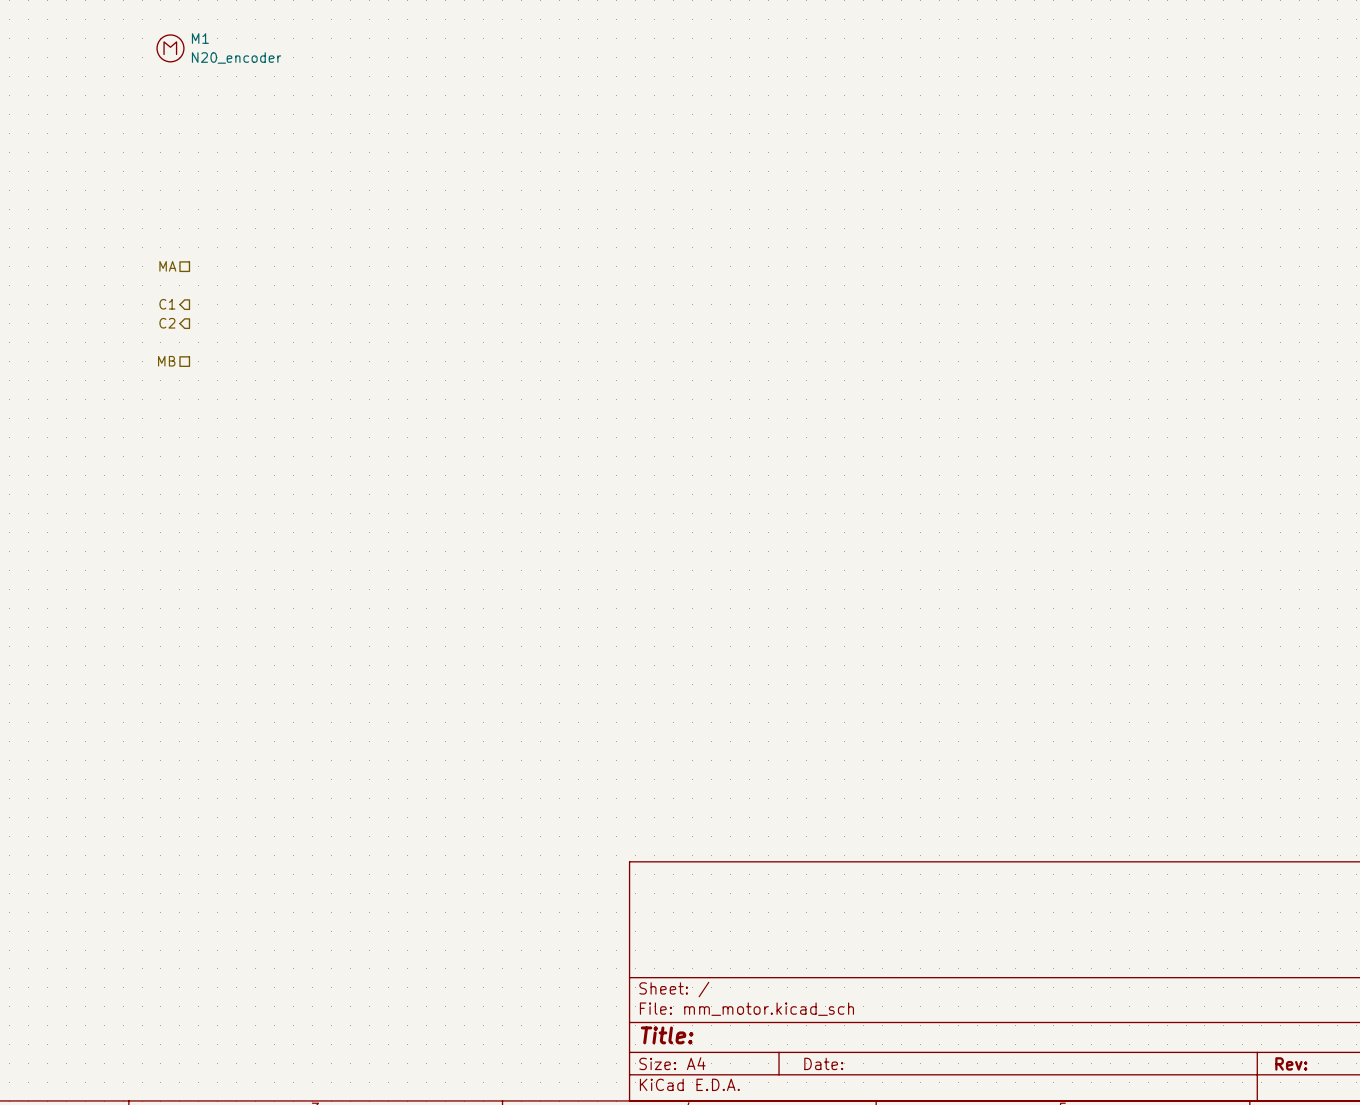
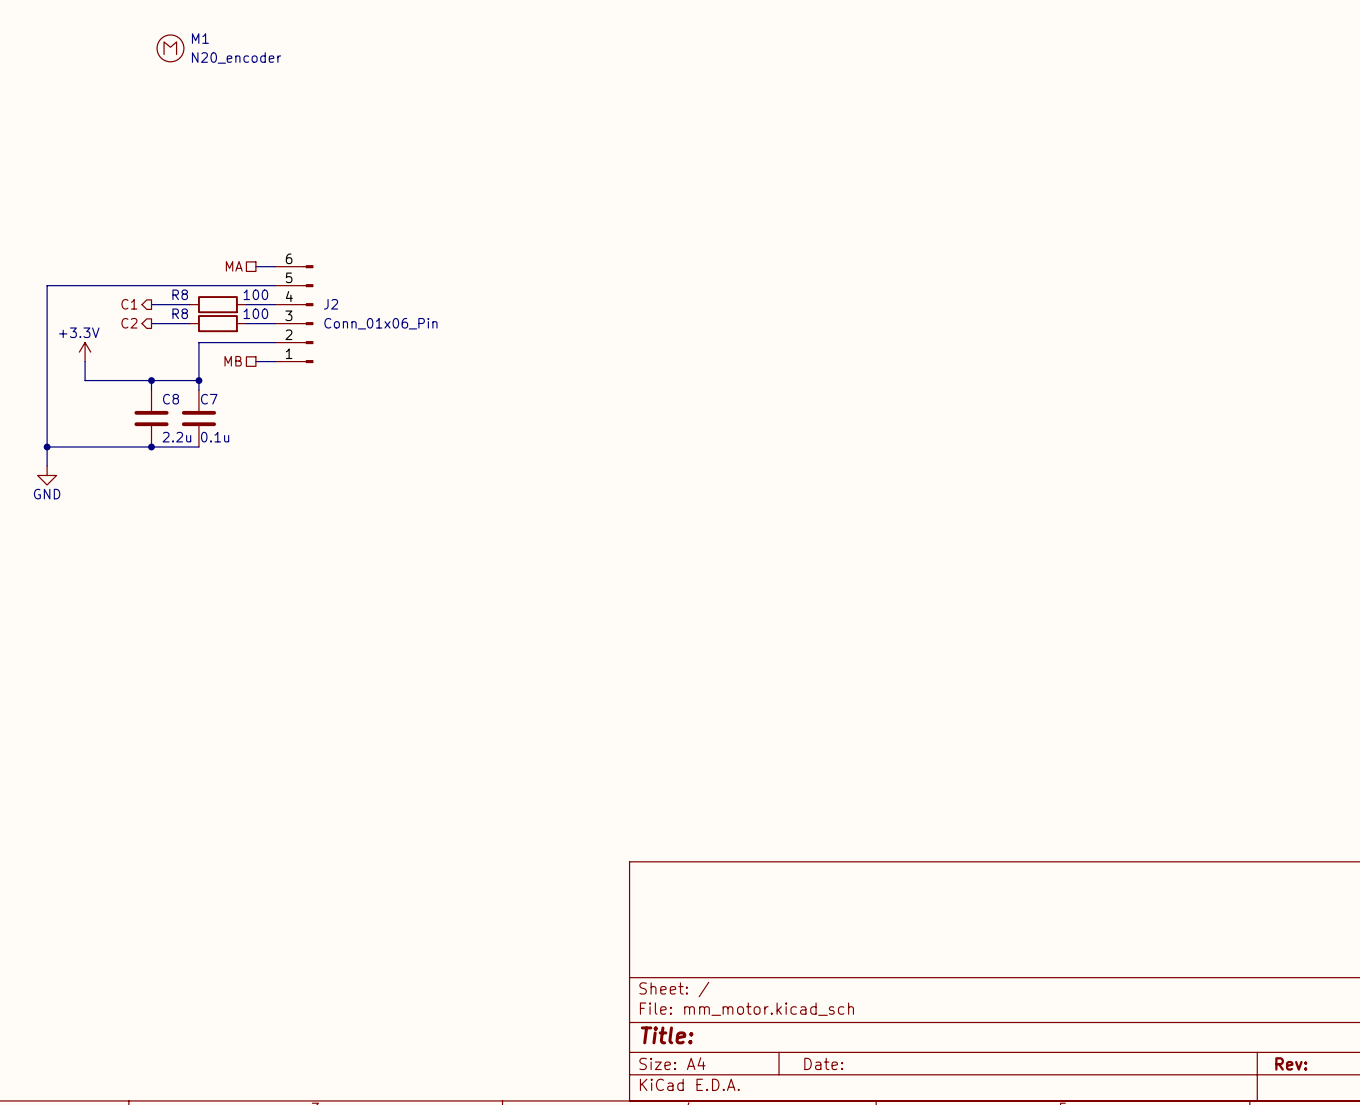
hierarchical label position: MA (167, 266) -> MA (234, 266)
wire: none -> (255, 266) (274, 266)
wire: none -> (274, 285) (47, 285) (47, 465)
wire: none -> (151, 304) (189, 304)
hierarchical label position: C1 (167, 304) -> C1 (129, 304)
R8: none -> 100 (217, 304)
wire: none -> (246, 304) (274, 304)
J2: none -> Conn_01x06_Pin (294, 314)
wire: none -> (151, 323) (189, 323)
hierarchical label position: C2 (167, 323) -> C2 (129, 323)
R8: none -> 100 (217, 323)
wire: none -> (246, 323) (274, 323)
wire: none -> (274, 342) (198, 342) (198, 390)
power symbol: none -> +3.3V (85, 352)
wire: none -> (85, 361) (85, 380) (198, 380)
hierarchical label position: MB (166, 361) -> MB (233, 361)
wire: none -> (255, 361) (274, 361)
wire: none -> (151, 380) (151, 390)
junction: none -> (151, 380)
junction: none -> (198, 380)
C8: none -> 2.2u (151, 418)
C7: none -> 0.1u (198, 418)
wire: none -> (47, 447) (198, 447)
junction: none -> (47, 447)
junction: none -> (151, 447)
power symbol: none -> GND (47, 475)

